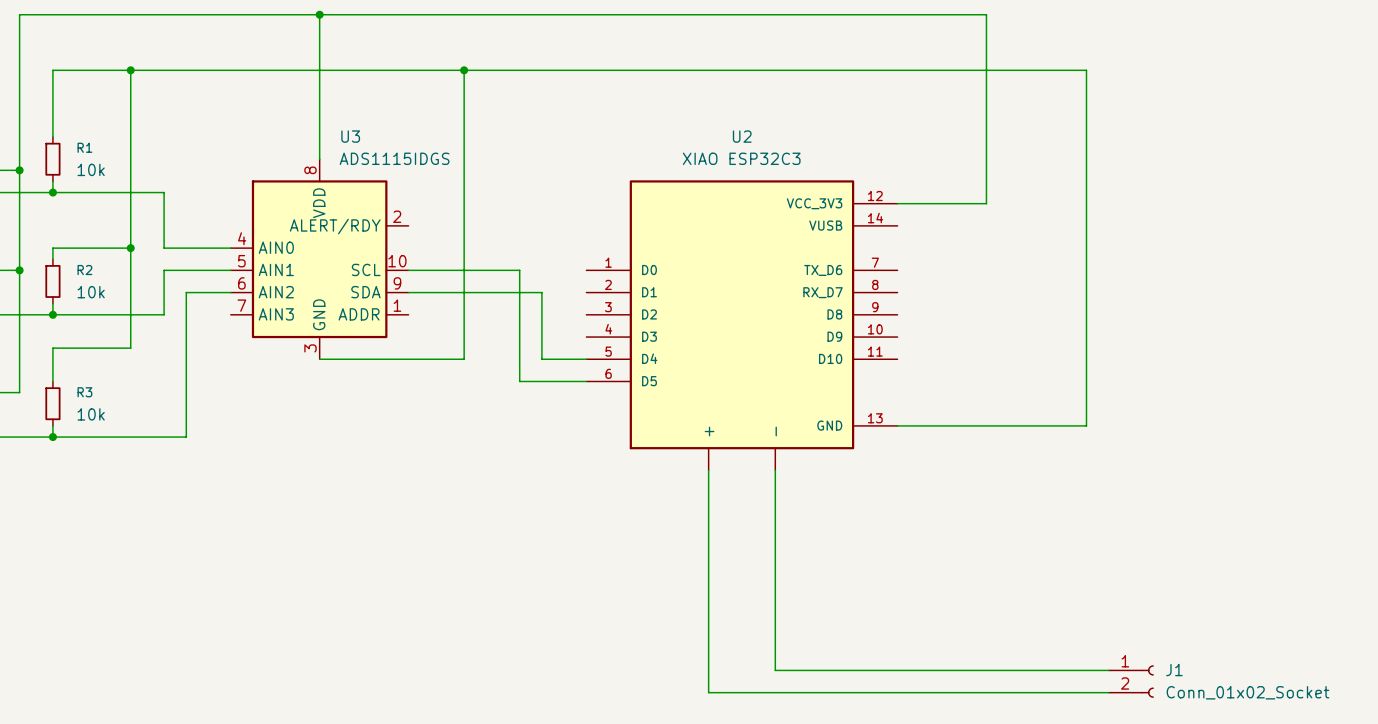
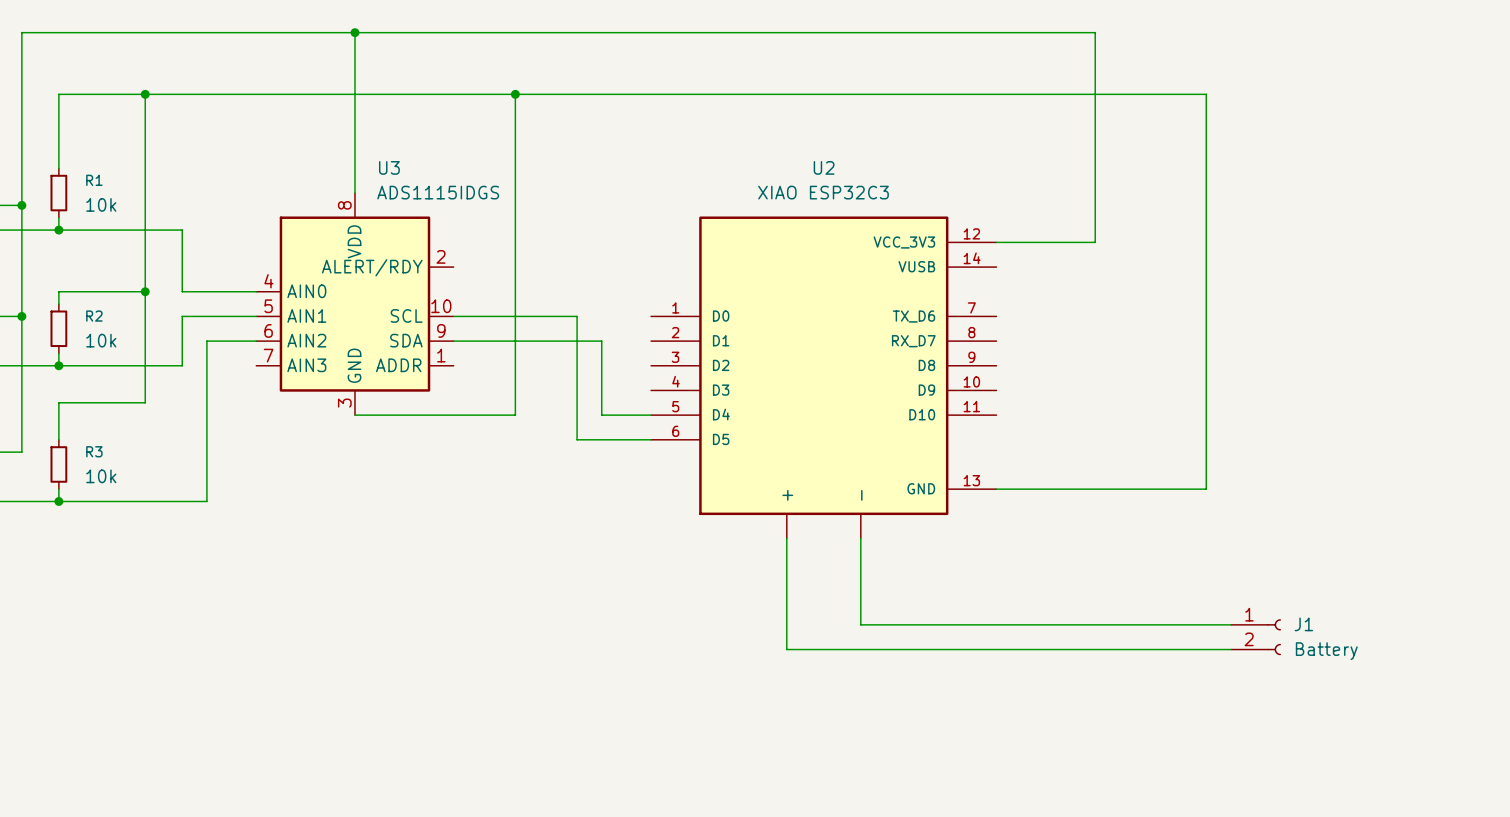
wire: (775, 548) (775, 670) (1108, 670) -> (860, 624) (1230, 624)
wire: (708, 570) (708, 692) (1108, 692) -> (786, 649) (1230, 649)
J1 position: (1131, 681) -> (1255, 637)
J1 value: Conn_01x02_Socket (1247, 692) -> Battery (1326, 651)

